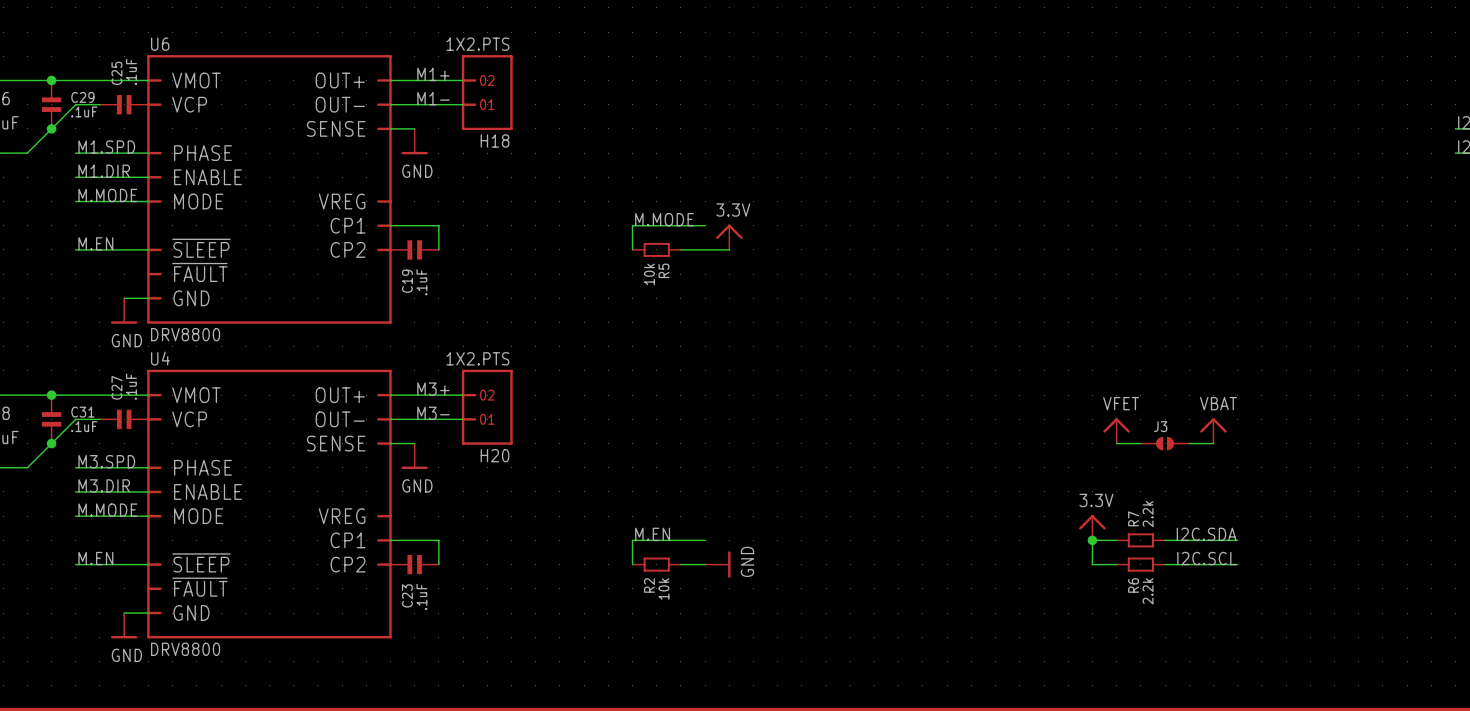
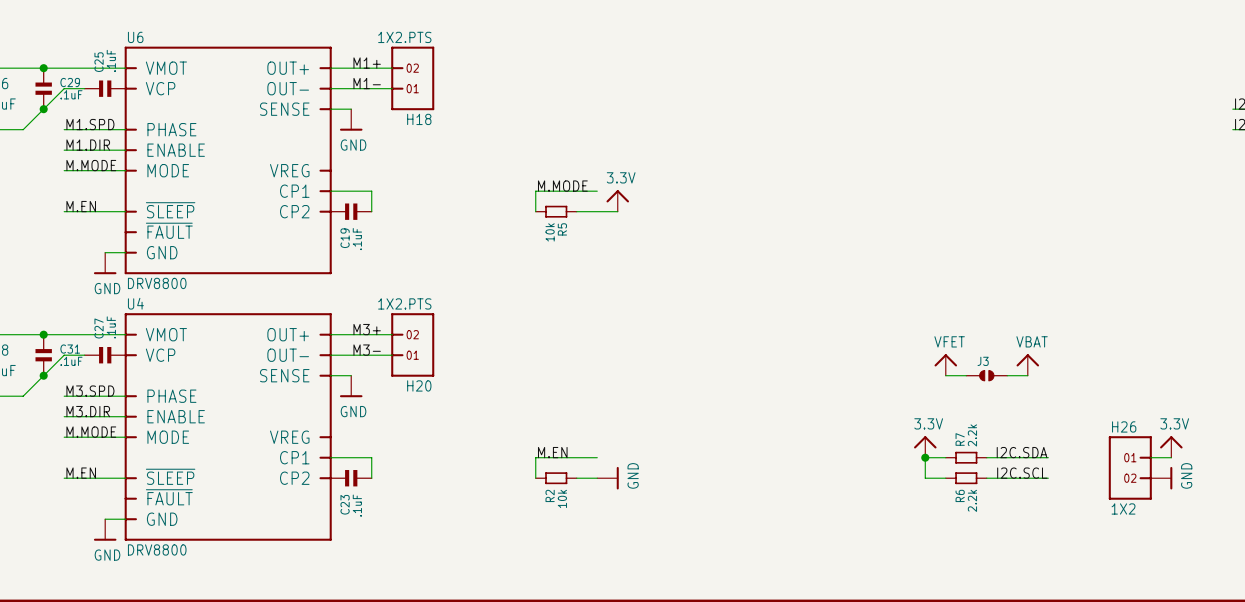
power symbol: none -> 3.3V (1171, 446)
wire: none -> (1150, 457) (1171, 457)
H26: none -> 1X2 (1130, 467)
power symbol: none -> GND (1161, 478)

